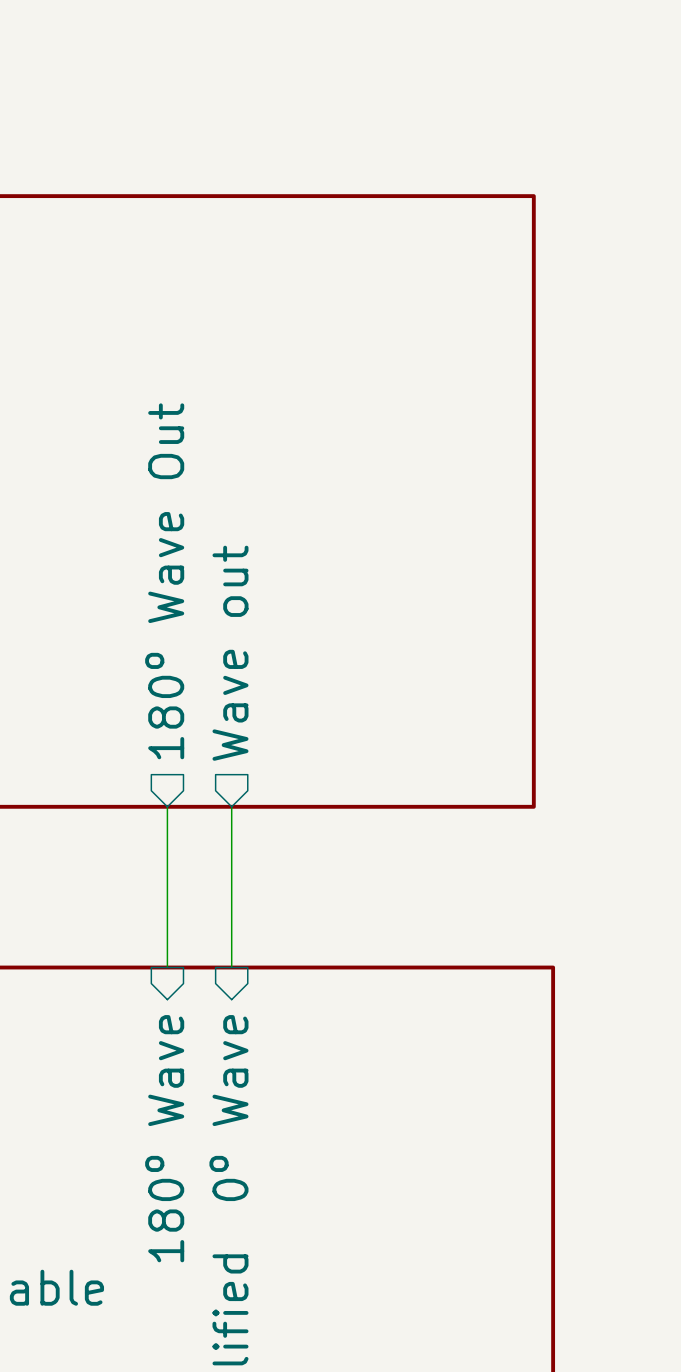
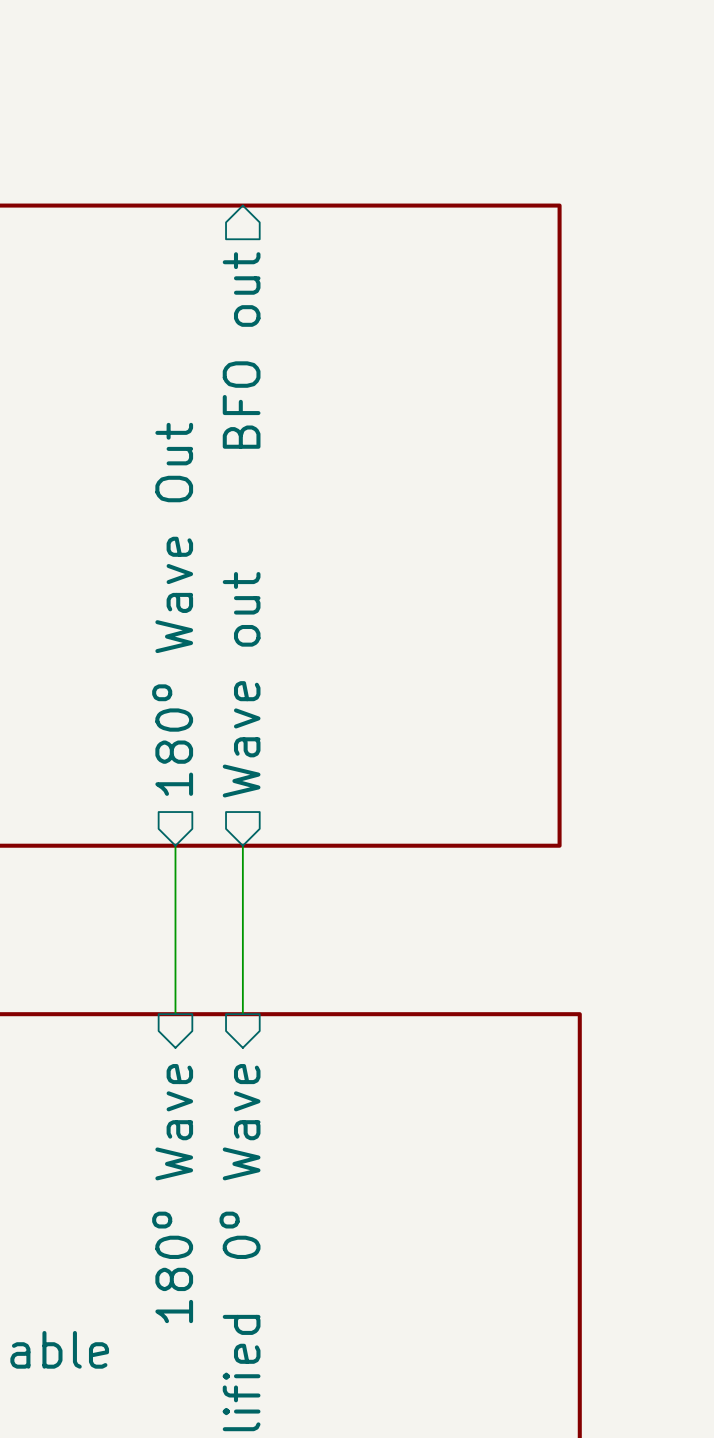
sheet pin: none -> BFO out (241, 350)

